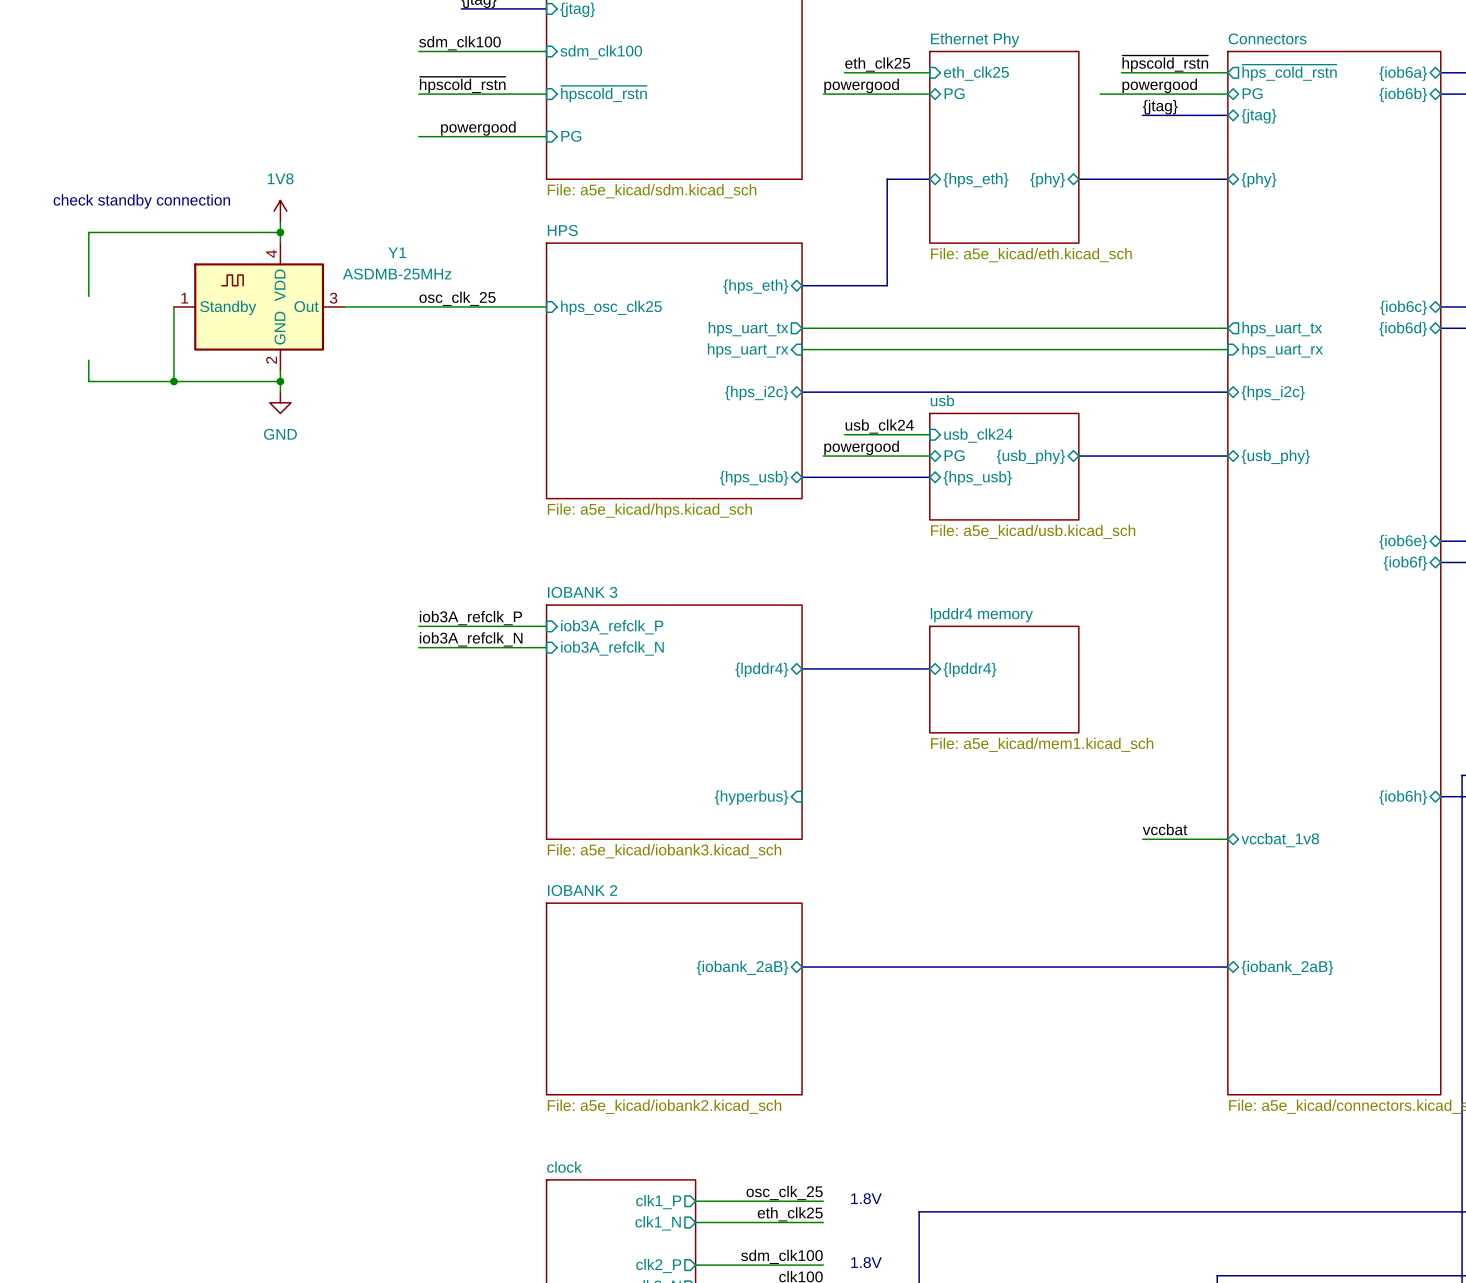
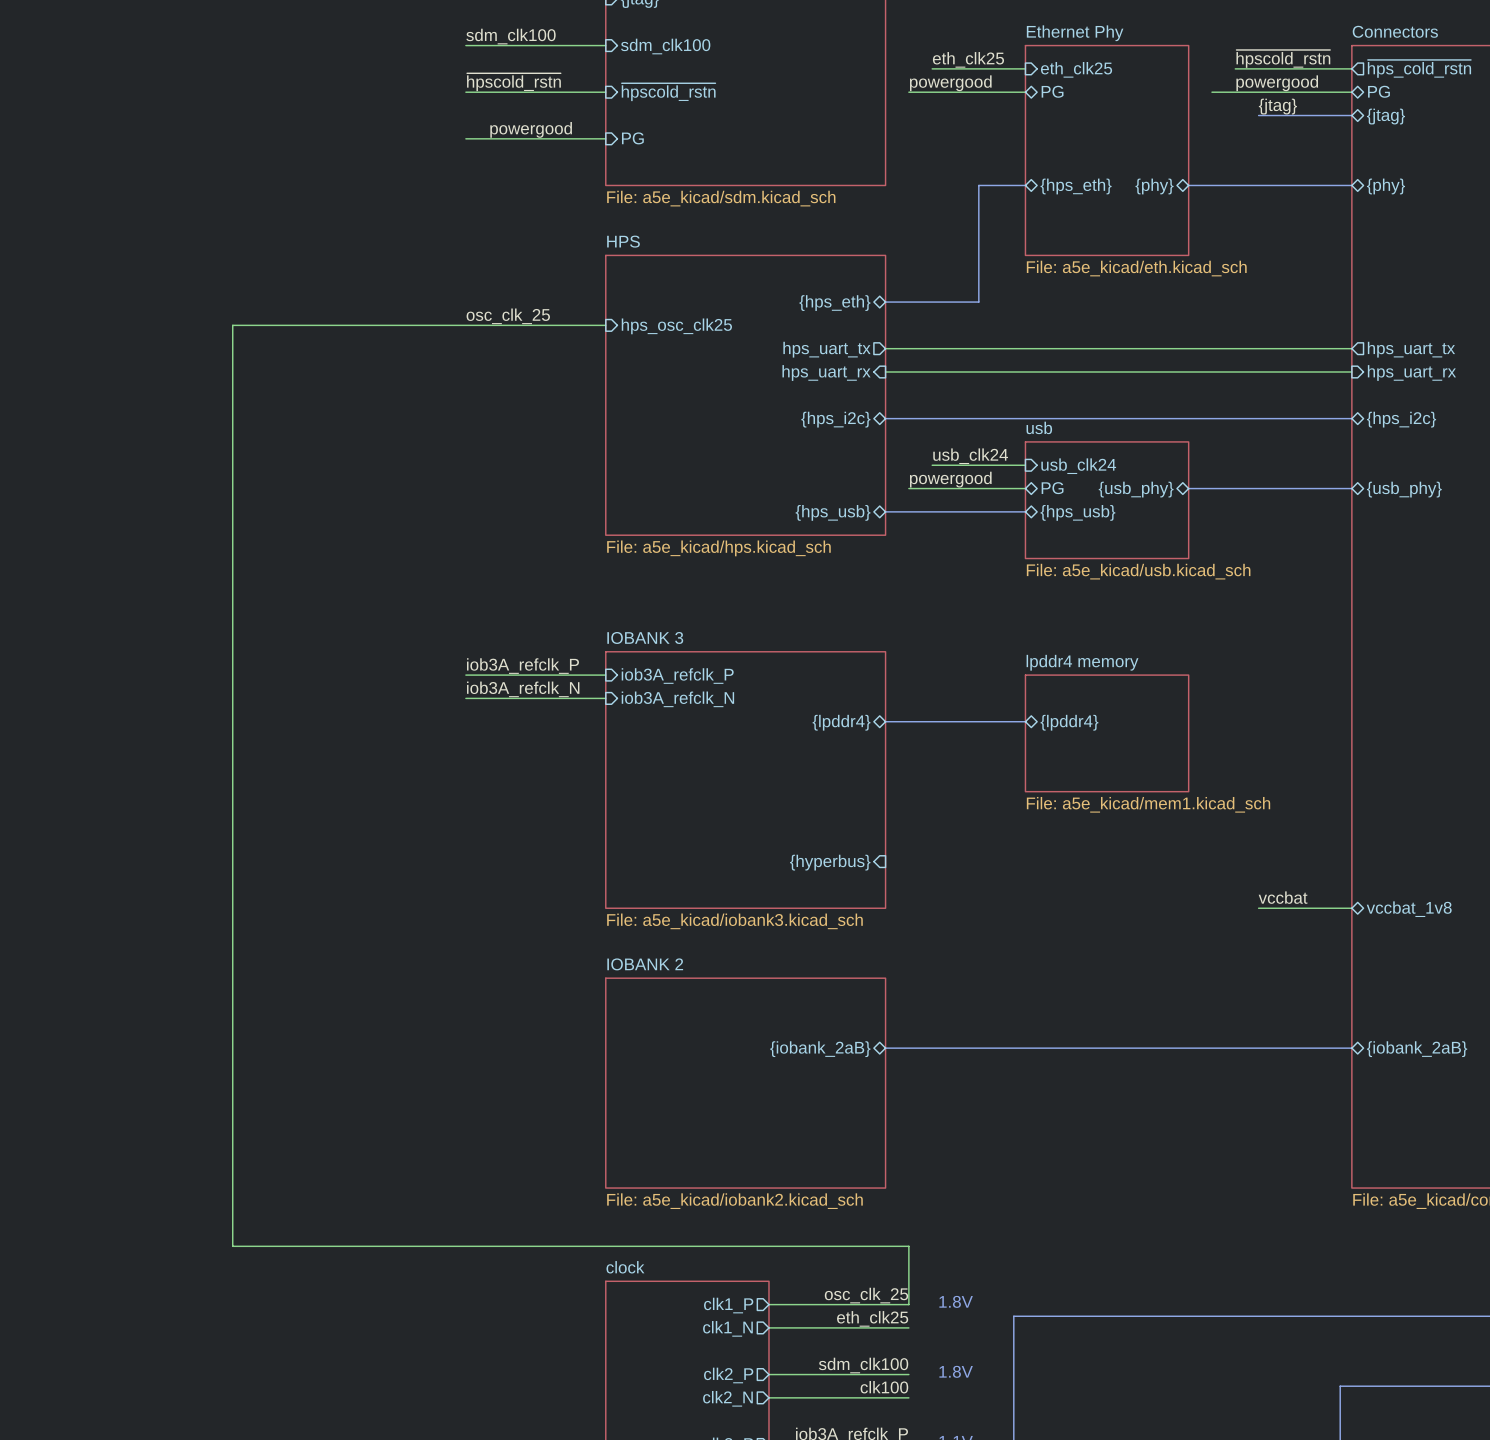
text: check standby connection (141, 201) -> none
power symbol: 1V8 (280, 211) -> none
wire: (280, 221) (280, 243) -> none
wire: (280, 232) (88, 232) (88, 296) -> none
junction: (280, 232) -> none
wire: (173, 306) (173, 381) -> none
Y1: ASDMB-25MHz (259, 306) -> none
wire: none -> (384, 325) (232, 325) (232, 1246) (908, 1246) (908, 1304)
wire: (88, 360) (88, 381) (280, 381) -> none
wire: (280, 370) (280, 392) -> none
junction: (173, 381) -> none
junction: (280, 381) -> none
power symbol: GND (280, 402) -> none

